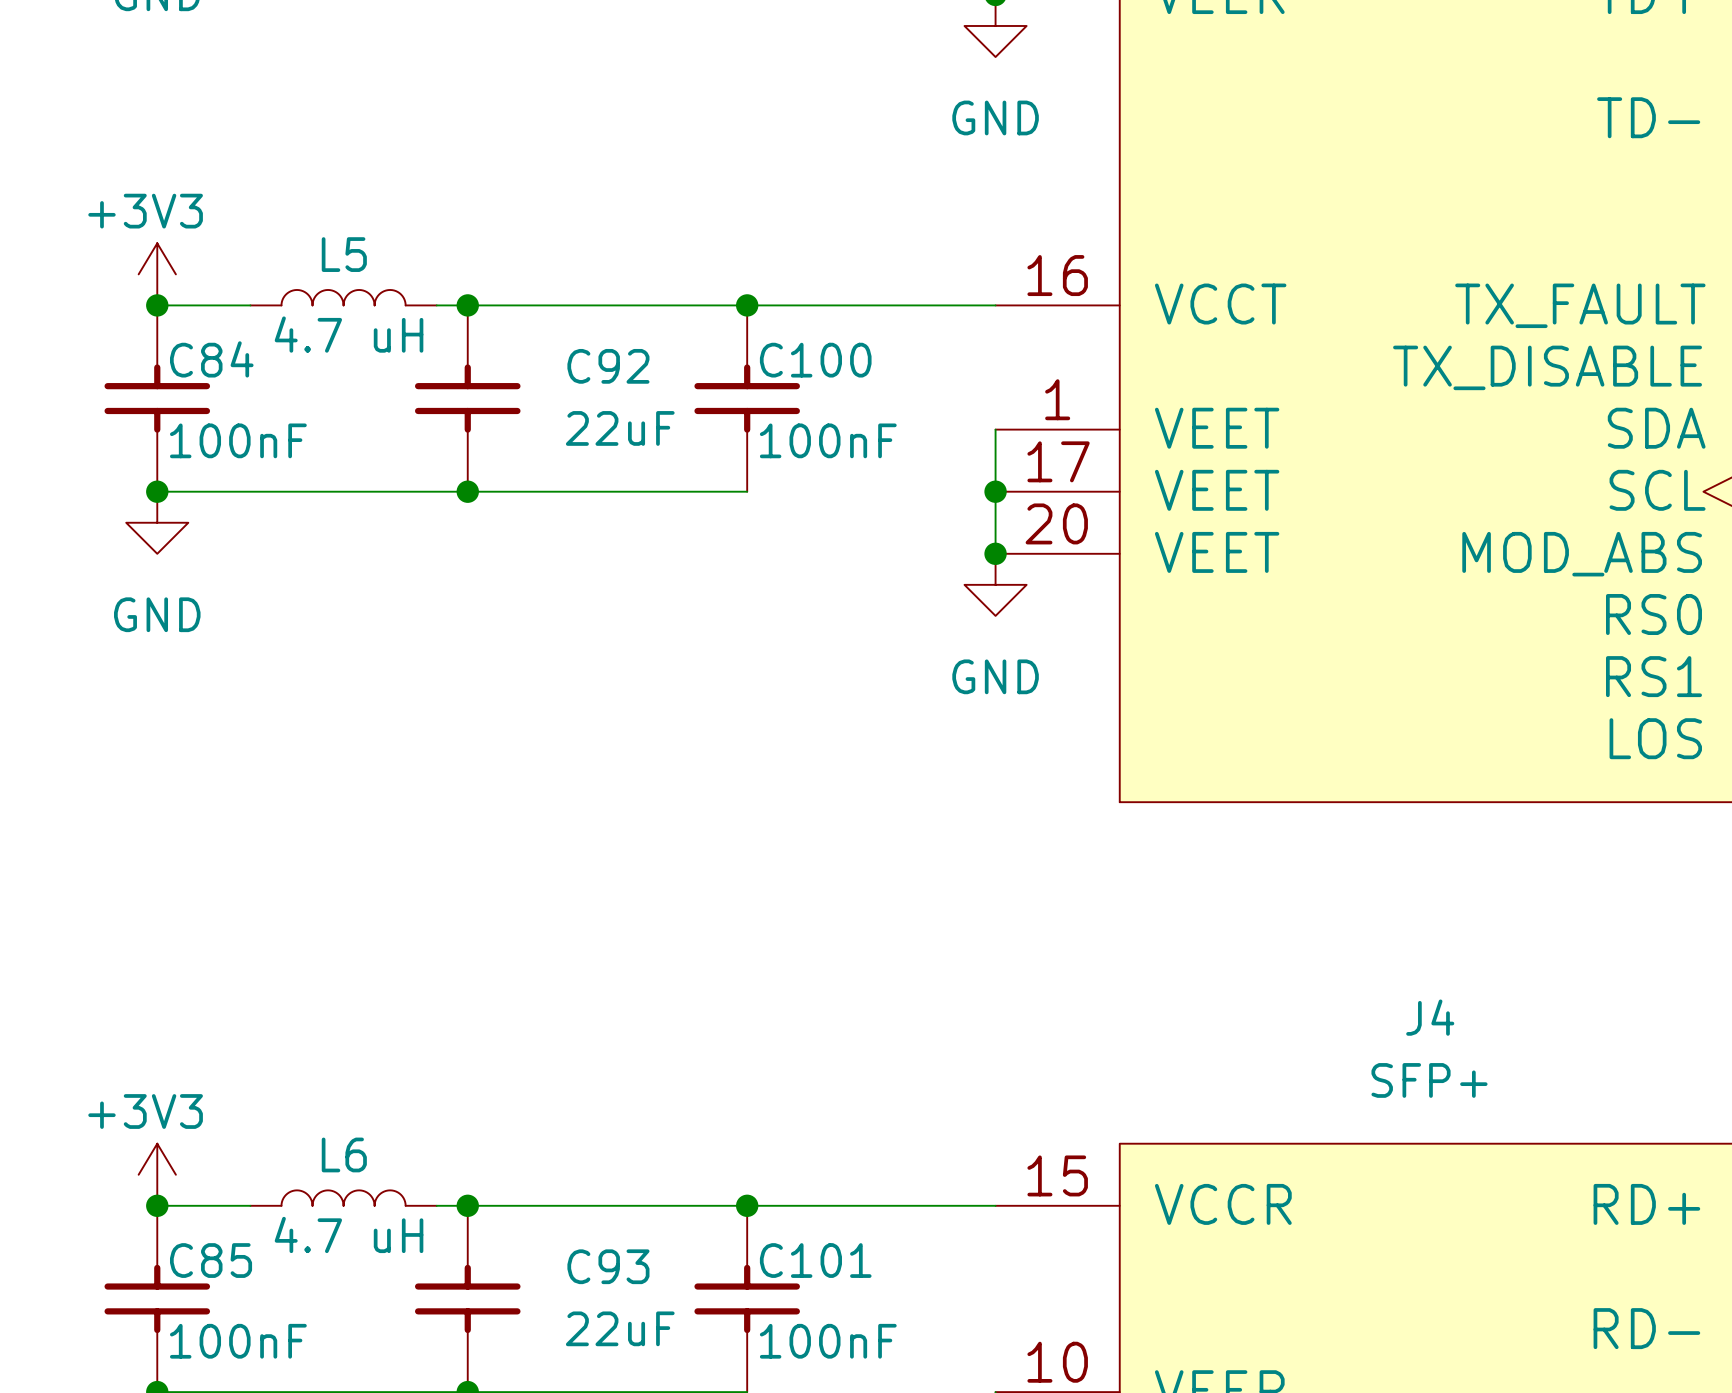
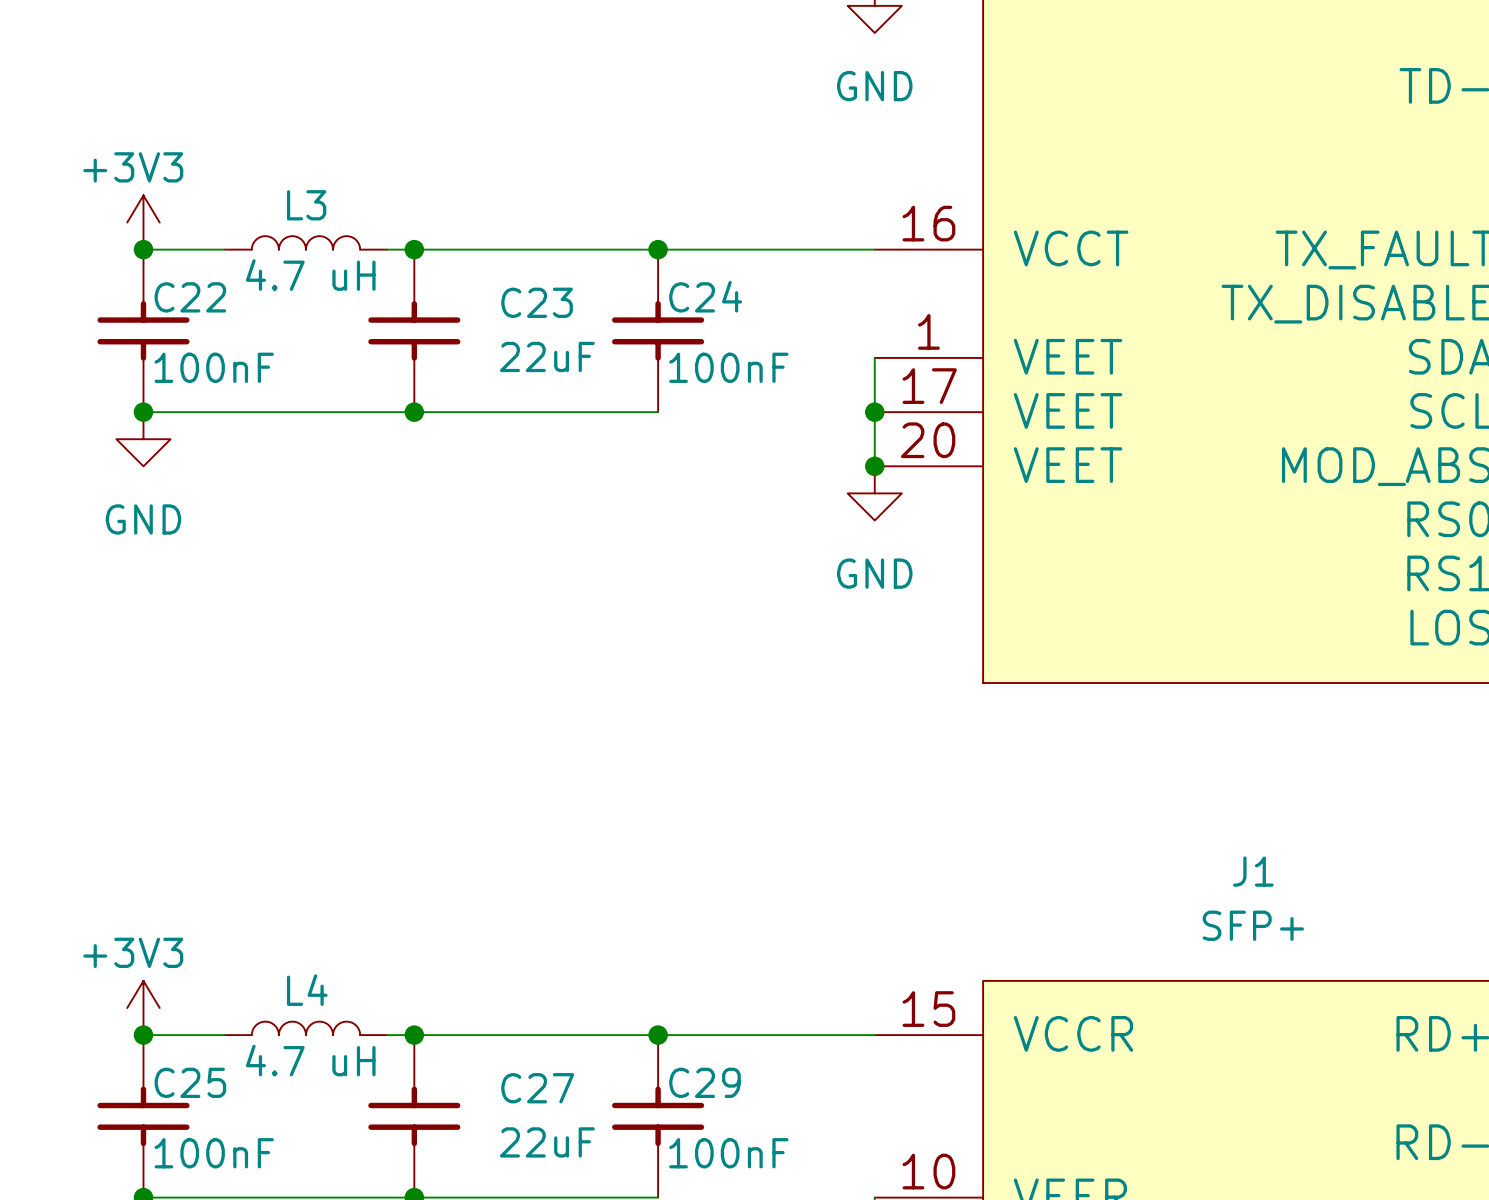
L5 name: L5 (344, 254) -> L3 (306, 205)
C84 name: C84 (211, 359) -> C22 (190, 297)
C100 name: C100 (815, 360) -> C24 (705, 296)
C92 name: C92 (608, 366) -> C23 (537, 302)
J4 name: J4 (1430, 1017) -> J1 (1253, 871)
L6 name: L6 (344, 1154) -> L4 (307, 990)
C85 name: C85 (211, 1260) -> C25 (190, 1082)
C101 name: C101 (815, 1260) -> C29 (704, 1082)
C93 name: C93 (608, 1266) -> C27 (537, 1088)

